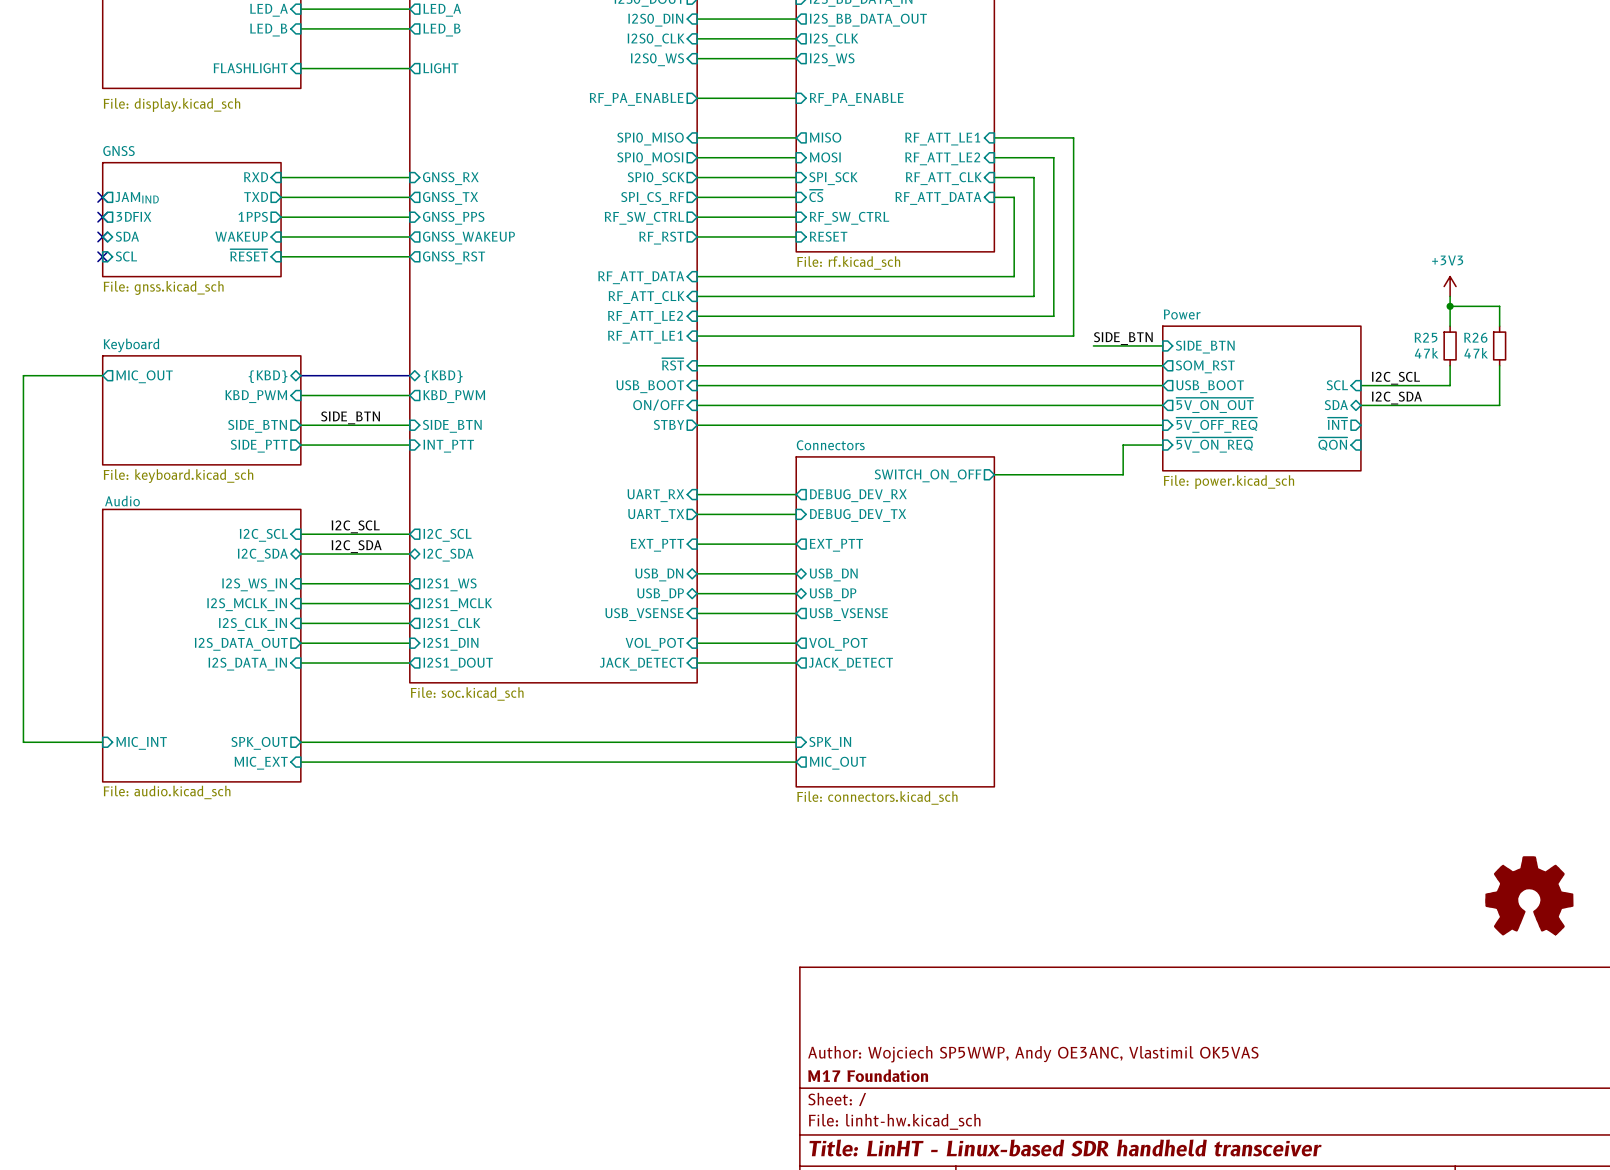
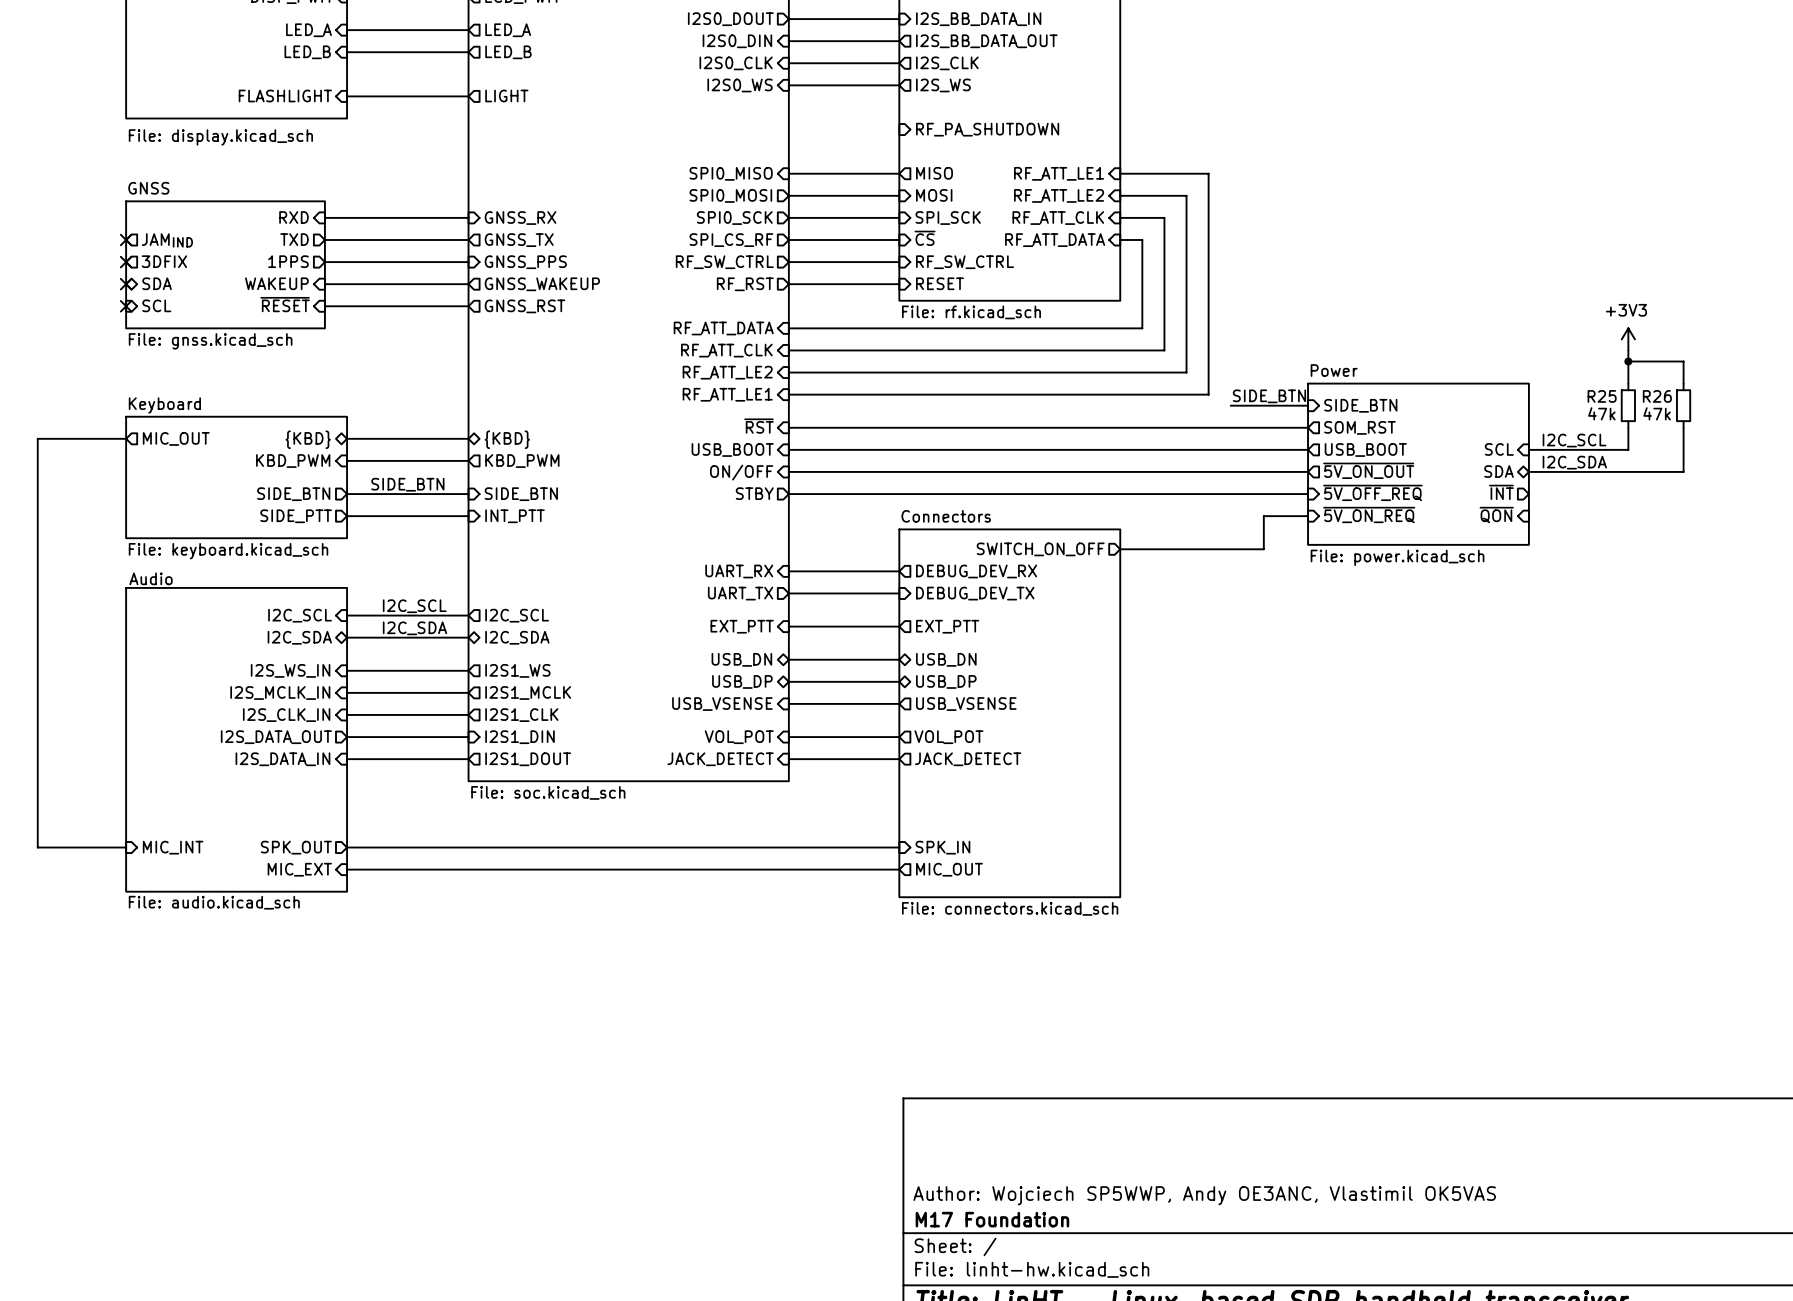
wire: (697, 98) (796, 98) -> none
sheet pin: RF_PA_ENABLE (636, 99) -> none
sheet pin: RF_PA_ENABLE (856, 99) -> RF_PA_SHUTDOWN (987, 129)
part: (1529, 895) -> none

